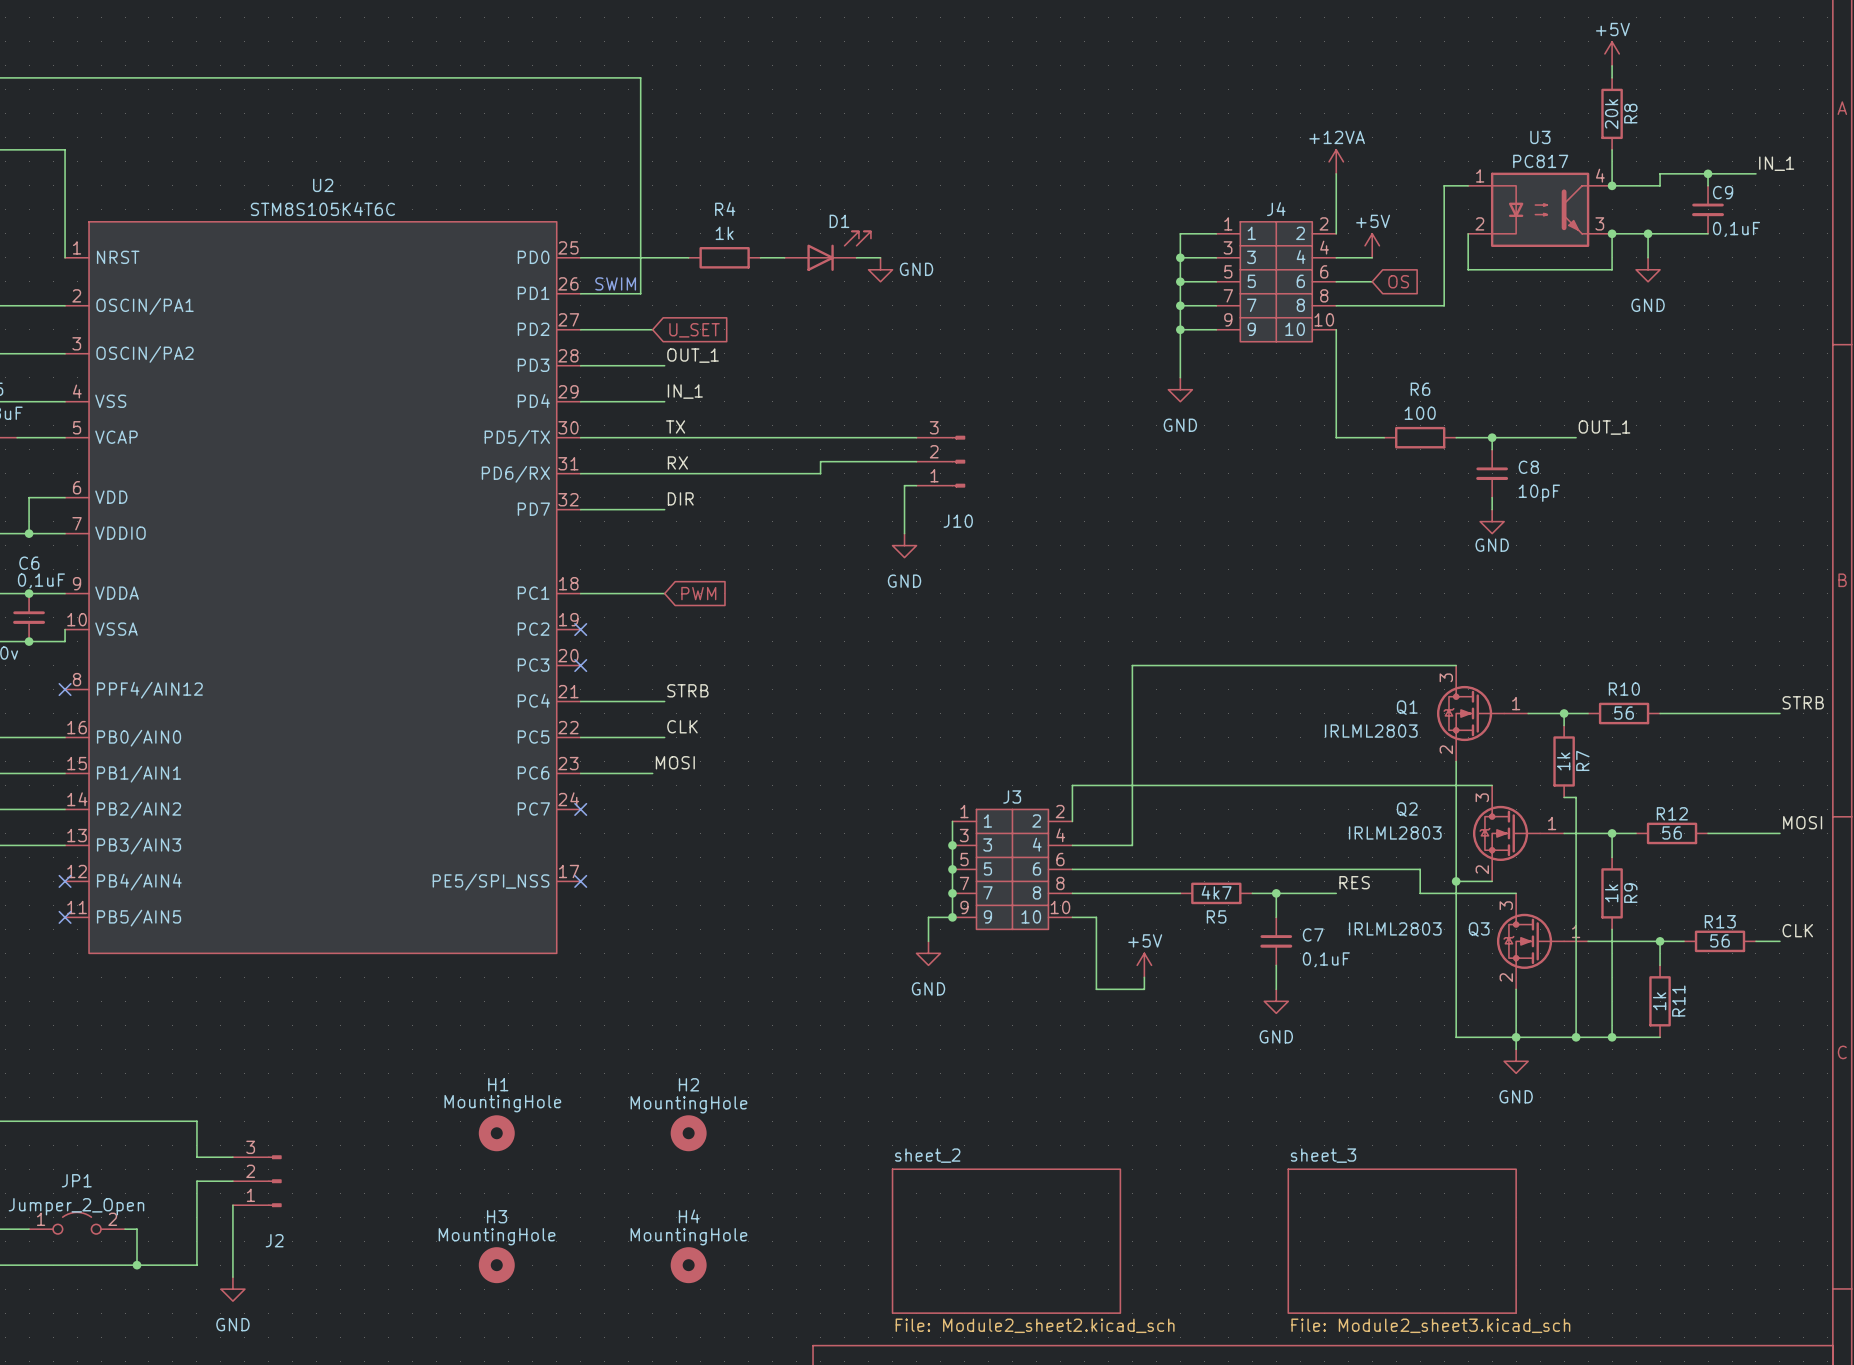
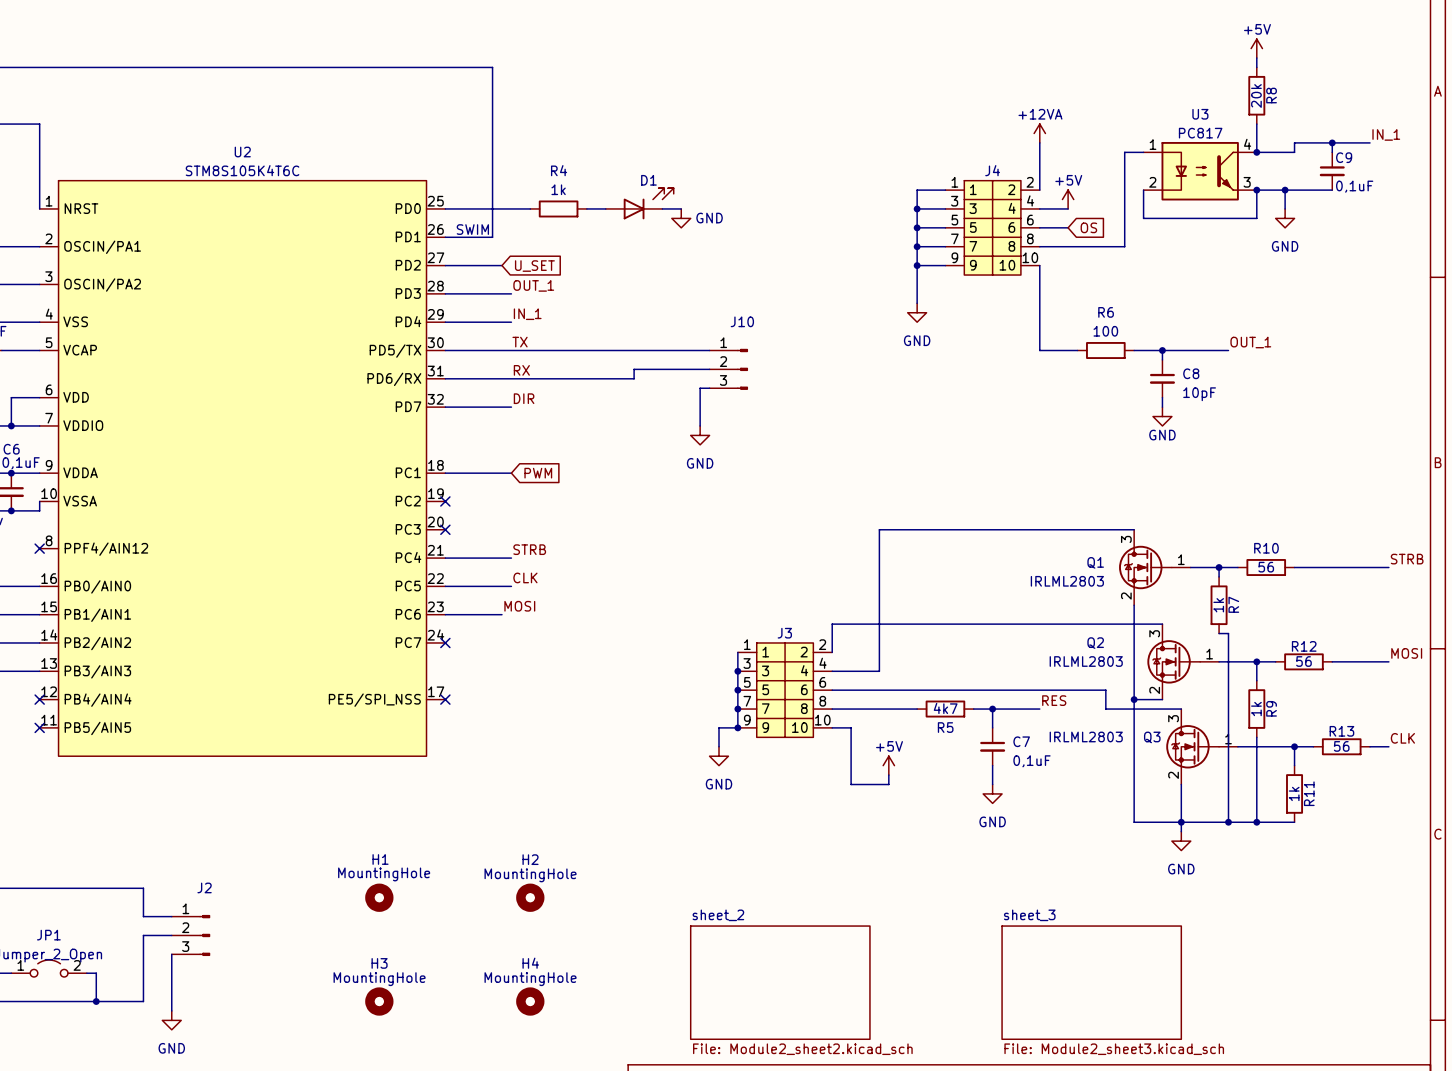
J10 flip: as is (958, 461) -> up-down (742, 369)
J2 flip: as is (274, 1181) -> up-down (204, 935)

